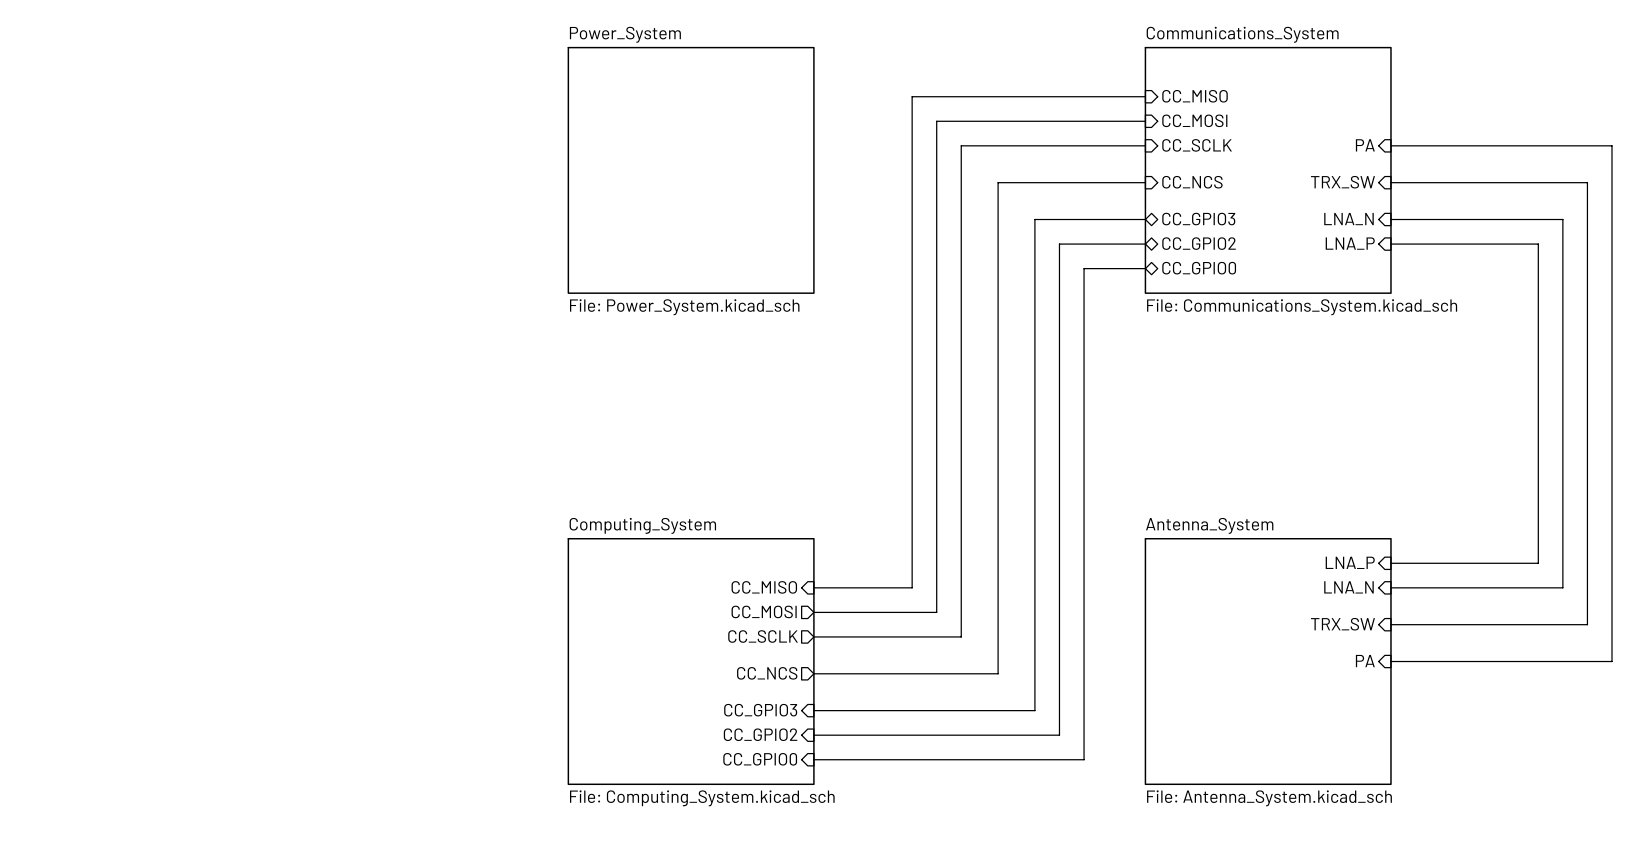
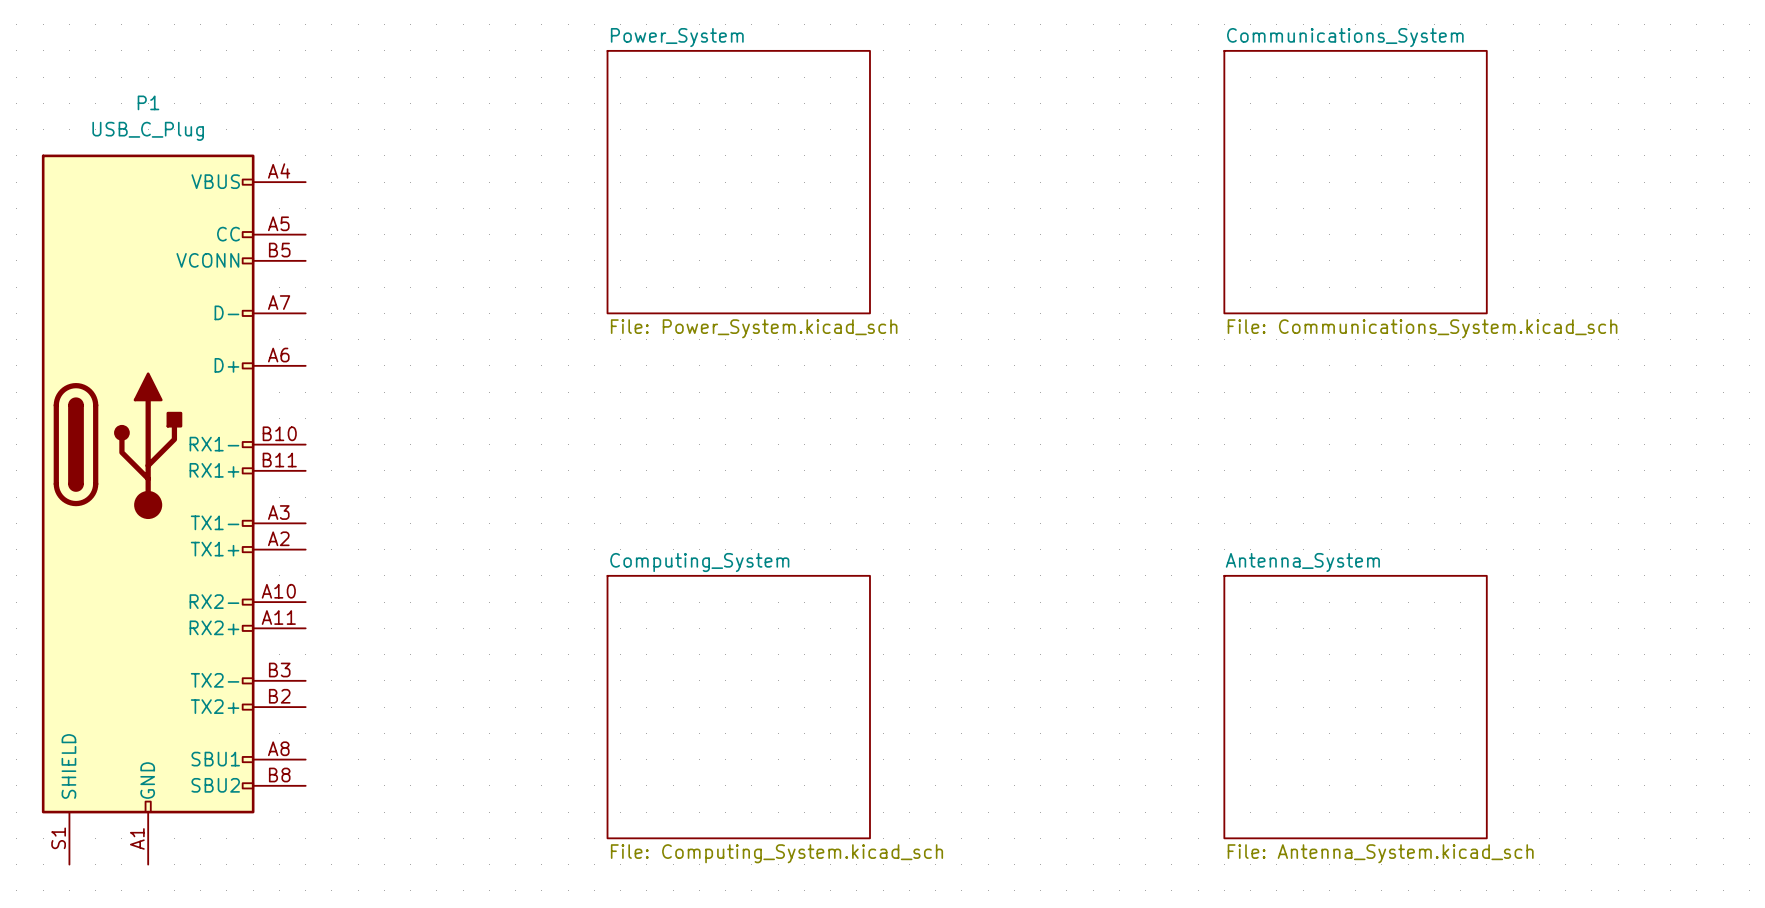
wire: (1145, 96) (912, 96) (912, 587) (813, 587) -> none
sheet pin: CC_MISO (1195, 96) -> none
sheet pin: CC_MOSI (1194, 120) -> none
wire: (1145, 121) (936, 121) (936, 612) (813, 612) -> none
wire: (1145, 145) (961, 145) (961, 636) (813, 636) -> none
sheet pin: CC_SCLK (1197, 145) -> none
sheet pin: PA (1365, 145) -> none
wire: (1390, 145) (1611, 145) (1611, 661) (1390, 661) -> none
wire: (1145, 182) (998, 182) (998, 673) (813, 673) -> none
sheet pin: CC_NCS (1192, 182) -> none
sheet pin: TRX_SW (1342, 182) -> none
wire: (1390, 182) (1587, 182) (1587, 624) (1390, 624) -> none
wire: (1145, 219) (1034, 219) (1034, 710) (813, 710) -> none
sheet pin: CC_GPIO3 (1198, 219) -> none
sheet pin: LNA_N (1348, 219) -> none
wire: (1390, 219) (1562, 219) (1562, 587) (1390, 587) -> none
sheet pin: CC_GPIO2 (1199, 243) -> none
sheet pin: LNA_P (1350, 243) -> none
wire: (1145, 244) (1059, 244) (1059, 735) (813, 735) -> none
wire: (1390, 244) (1538, 244) (1538, 563) (1390, 563) -> none
wire: (1145, 268) (1084, 268) (1084, 759) (813, 759) -> none
sheet pin: CC_GPIO0 (1199, 268) -> none
P1: none -> USB_C_Plug (173, 509)
sheet pin: LNA_P (1350, 562) -> none
sheet pin: CC_MISO (764, 587) -> none
sheet pin: LNA_N (1348, 587) -> none
sheet pin: CC_MOSI (764, 611) -> none
sheet pin: TRX_SW (1342, 624) -> none
sheet pin: CC_SCLK (763, 636) -> none
sheet pin: PA (1365, 661) -> none
sheet pin: CC_NCS (767, 673) -> none
sheet pin: CC_GPIO3 (760, 710) -> none
sheet pin: CC_GPIO2 (760, 734) -> none
sheet pin: CC_GPIO0 (760, 759) -> none

